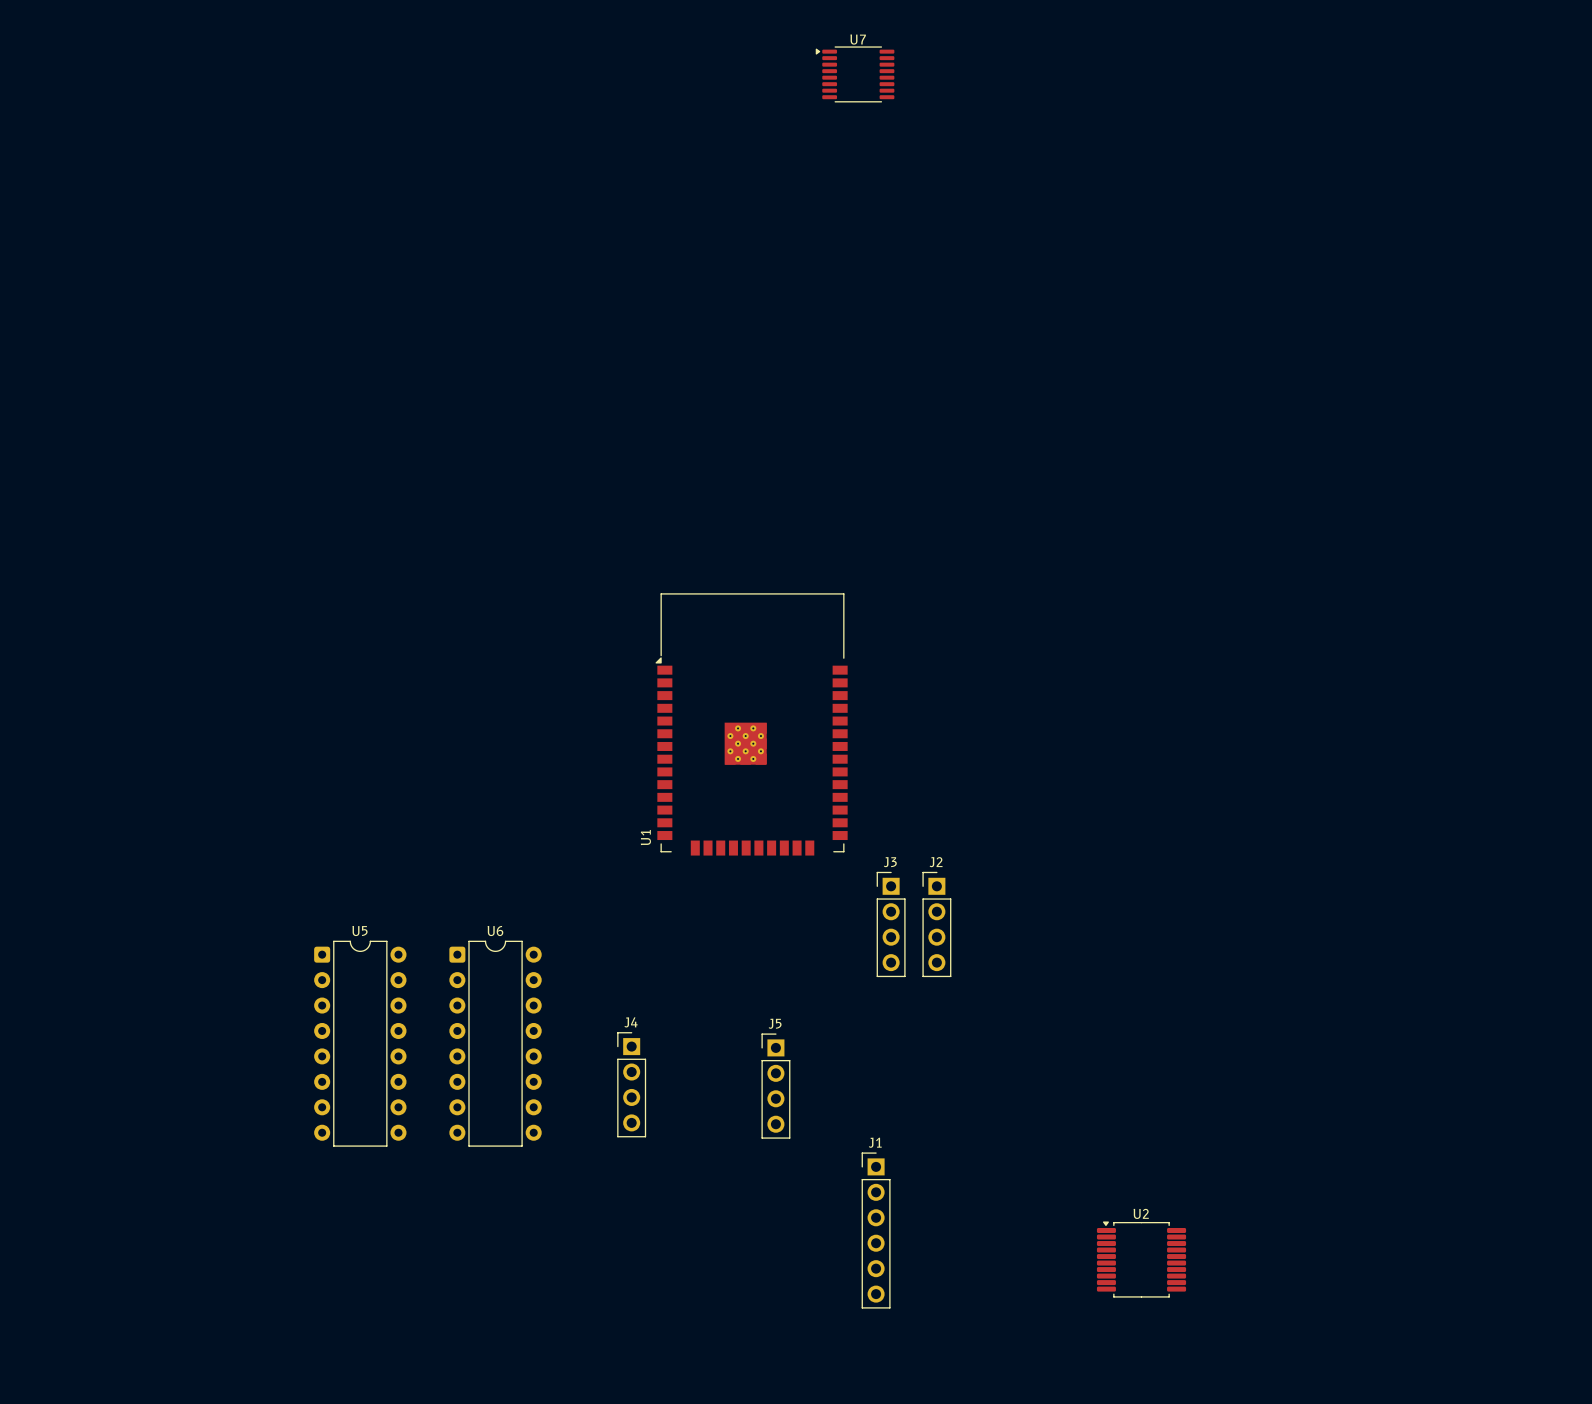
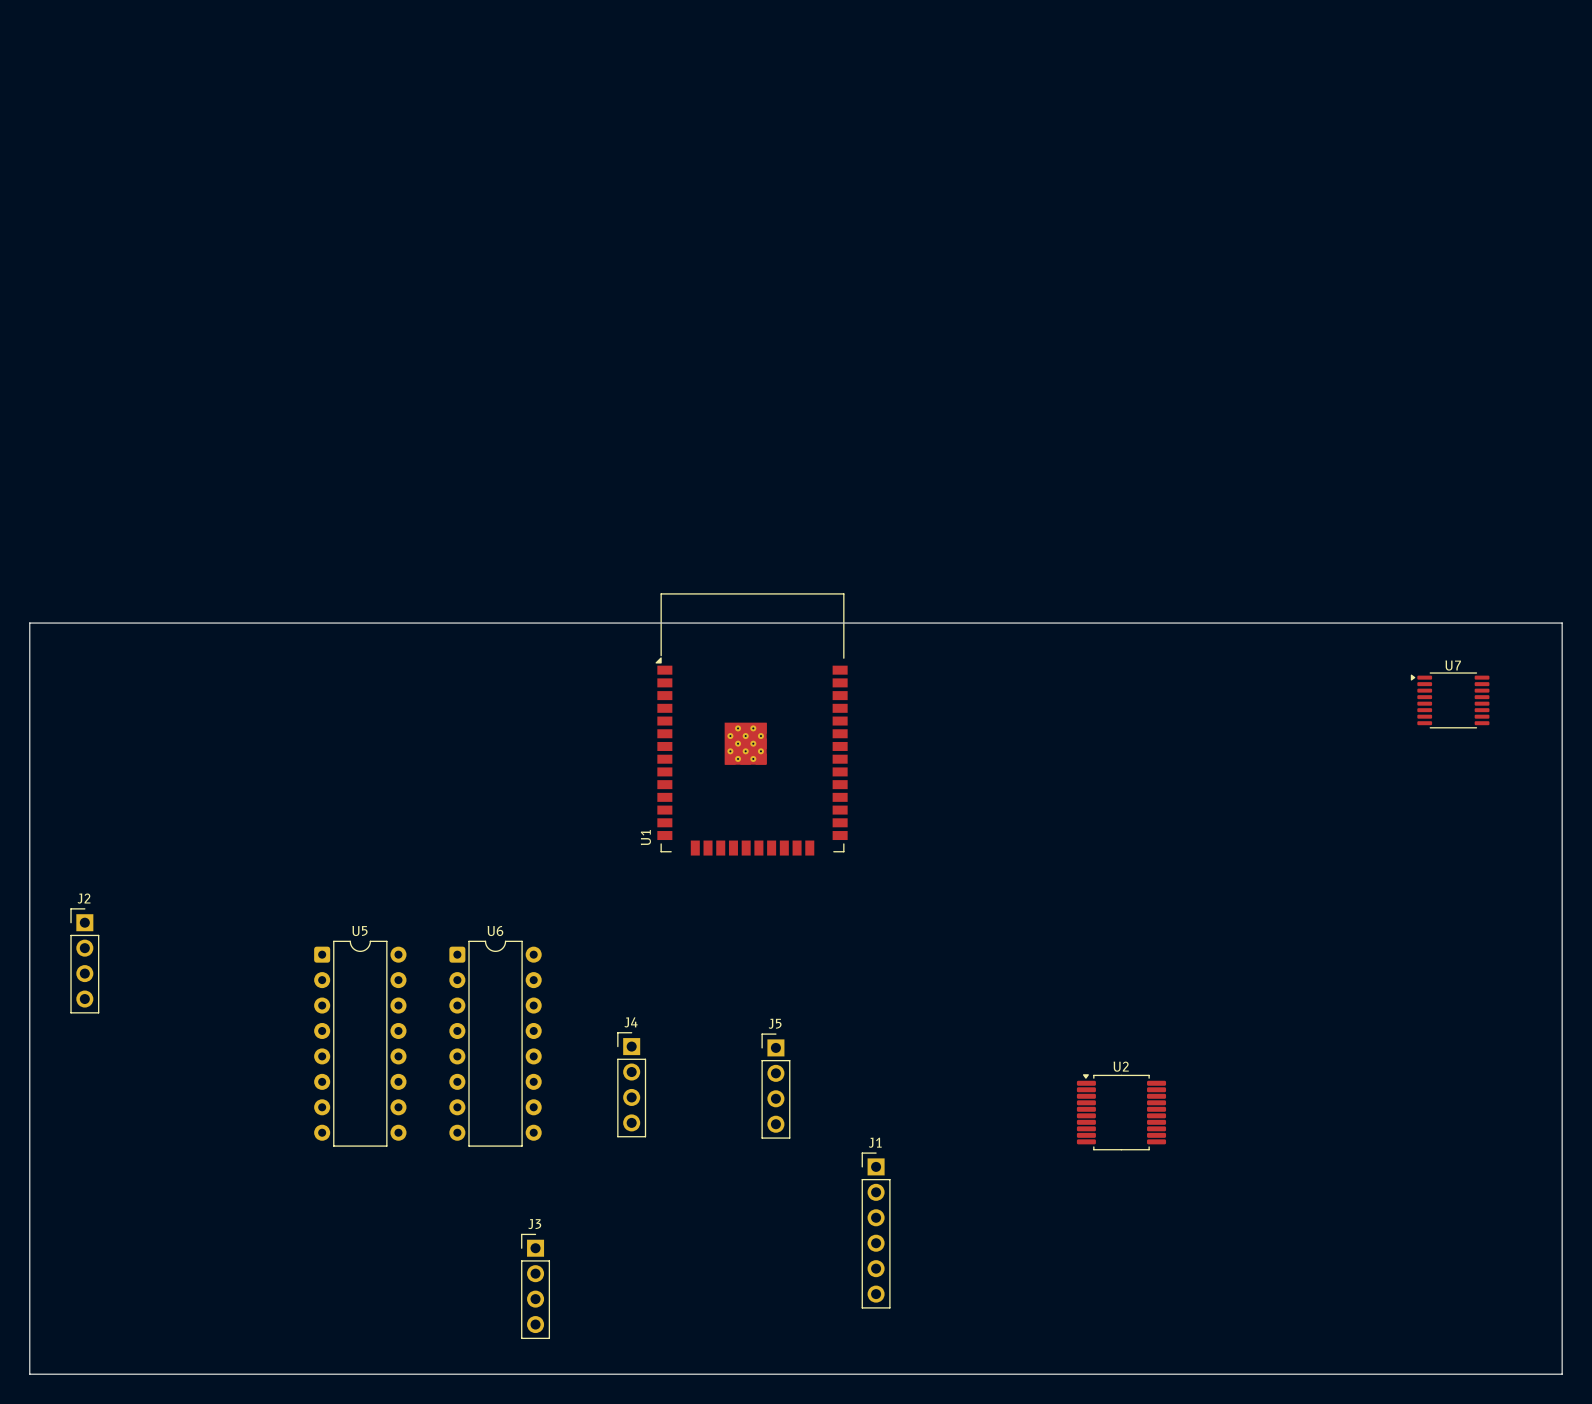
U7 position: (855, 74) -> (1450, 700)
board edge: none -> (29, 623) (1562, 623) (1562, 1374) (29, 1374) (29, 623)
J3 position: (891, 924) -> (535, 1286)
J2 position: (936, 924) -> (84, 960)
U2 position: (1141, 1259) -> (1121, 1112)

